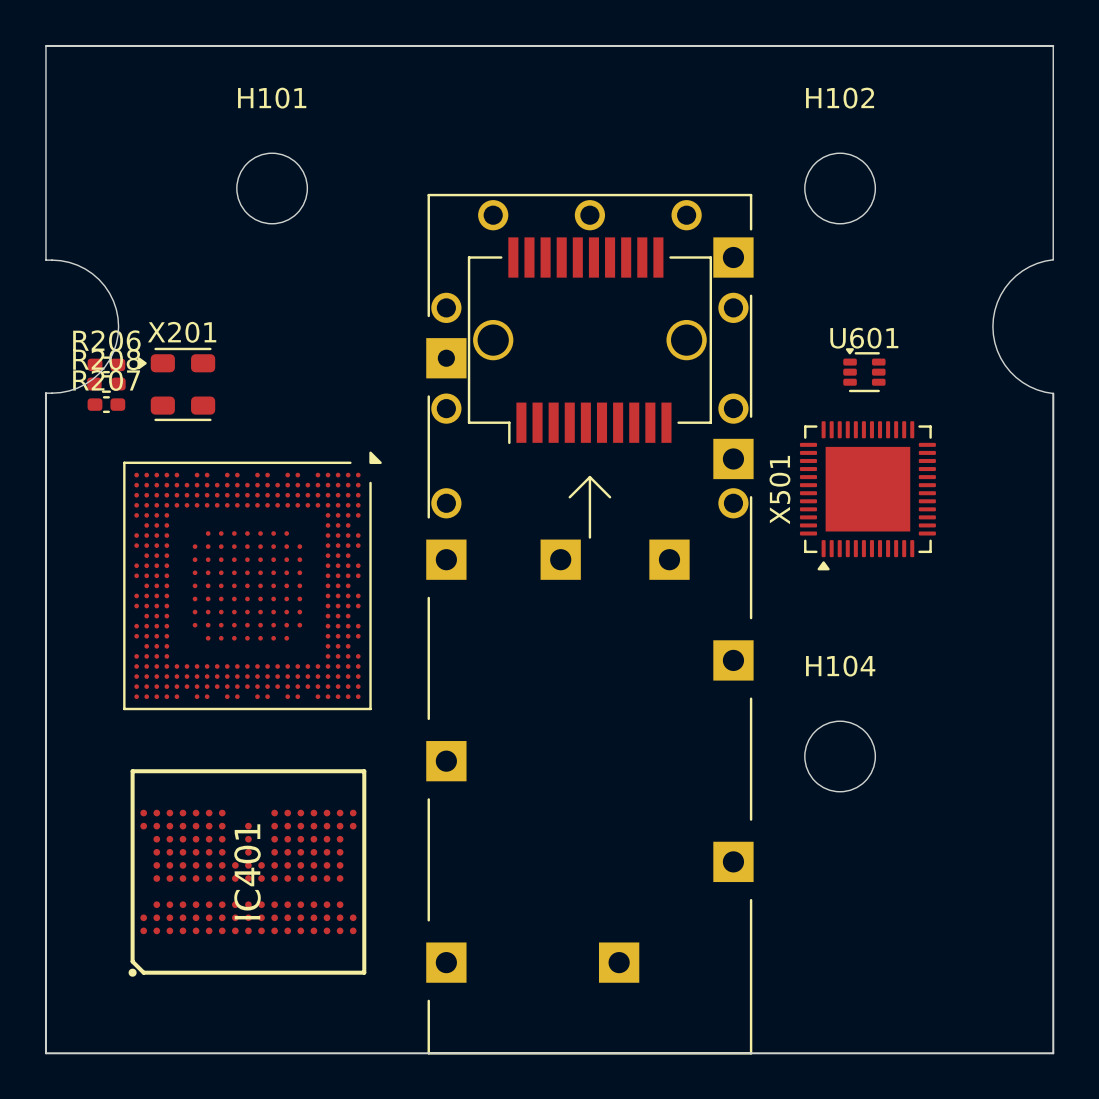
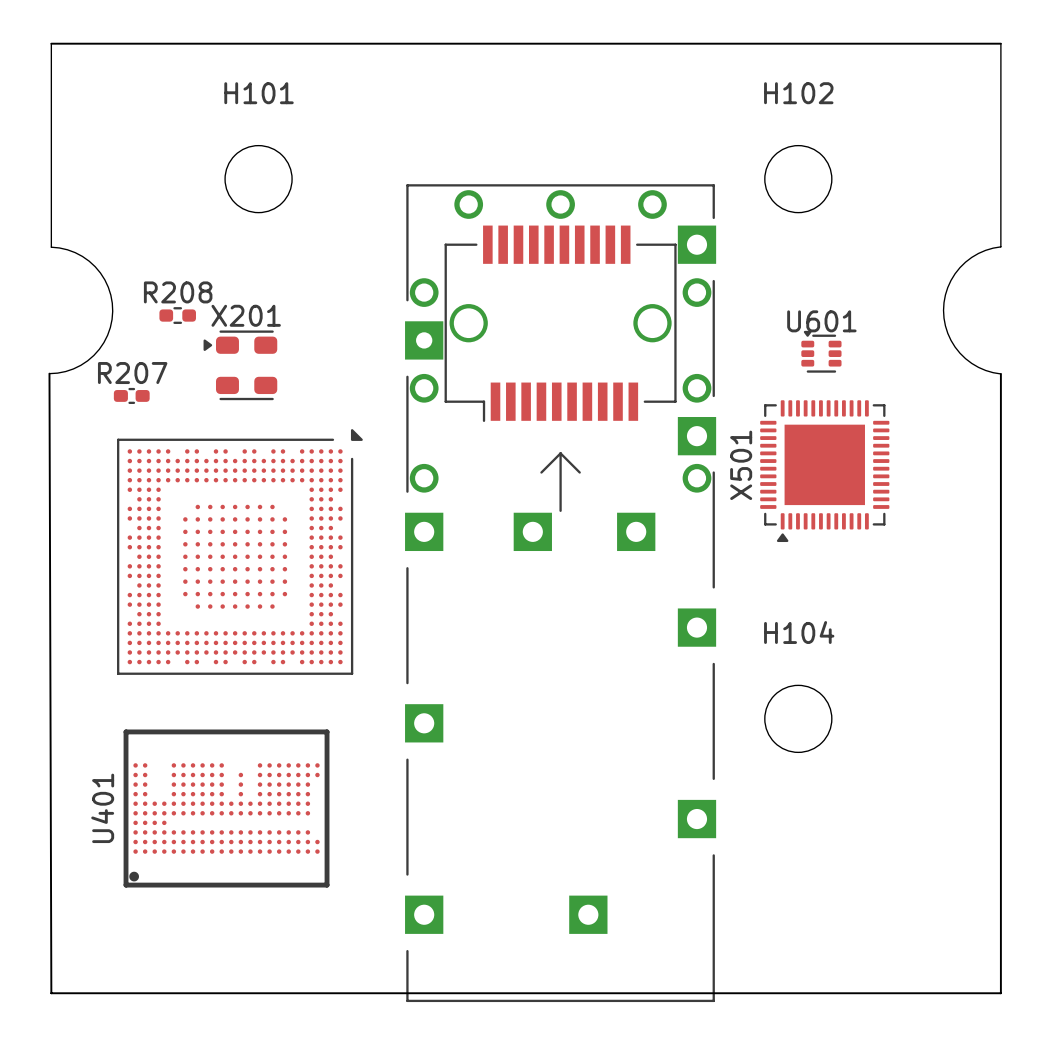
board edge: (54, 45) (45, 45) (45, 260) (60, 260) (77, 265) (99, 279) (113, 301) (118, 326) (113, 352) (99, 373) (77, 388) (60, 392) (45, 393) -> none
R206: (106, 364) -> none
R208 position: (106, 384) -> (177, 315)
X201 position: (176, 384) -> (240, 365)
board edge: (45, 392) (45, 1053) (1053, 1053) (1053, 1045) -> (51, 43) (51, 247) (75, 252) (95, 266) (108, 287) (112, 311) (107, 335) (93, 355) (73, 368) (49, 373) (51, 993) (1000, 993)
R207 position: (106, 404) -> (131, 395)
U401: none -> (226, 808)
IC401: (247, 872) -> none

